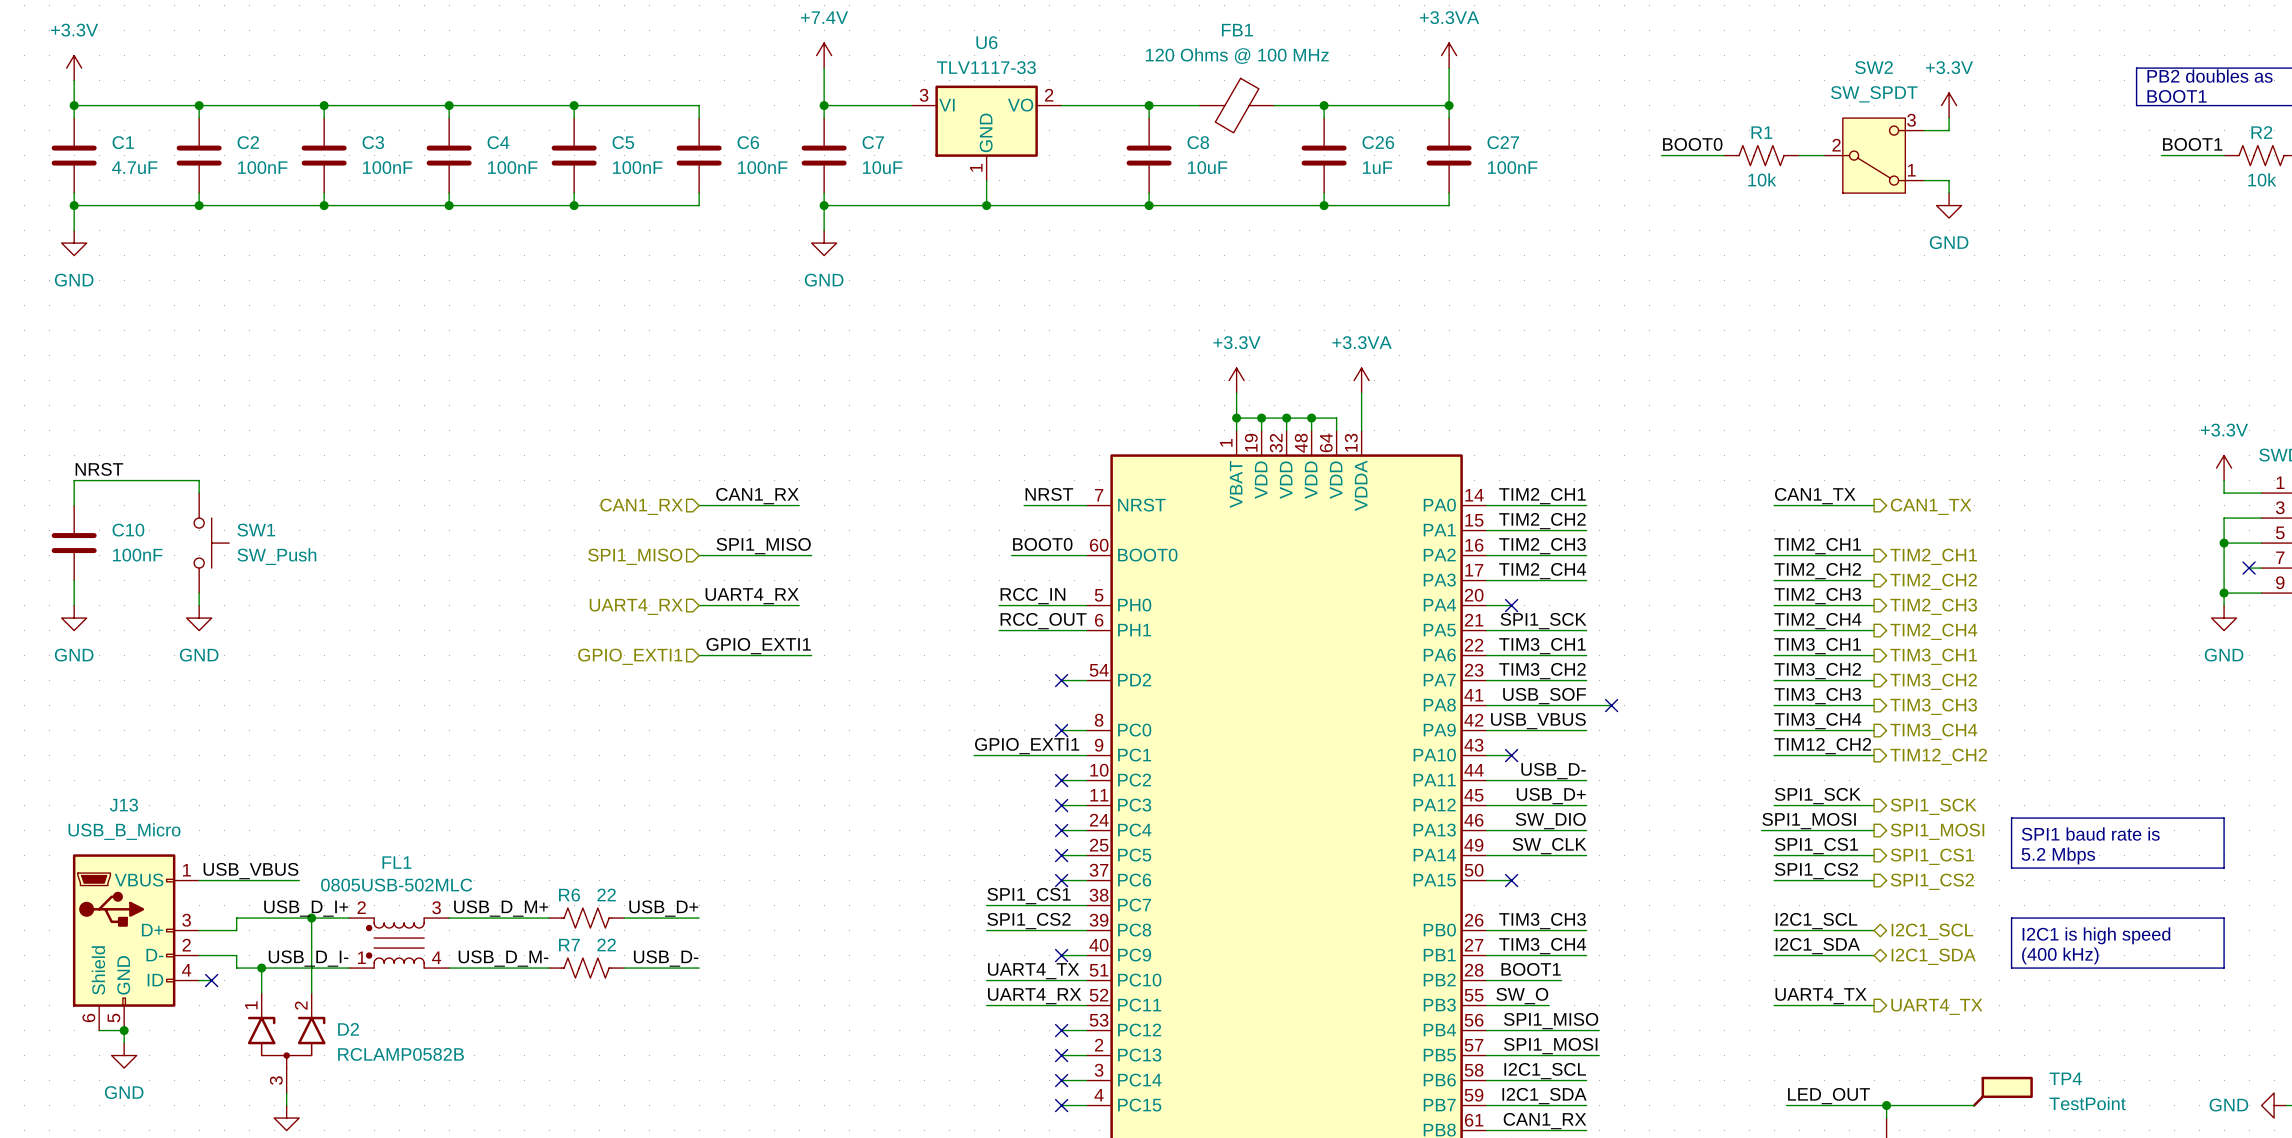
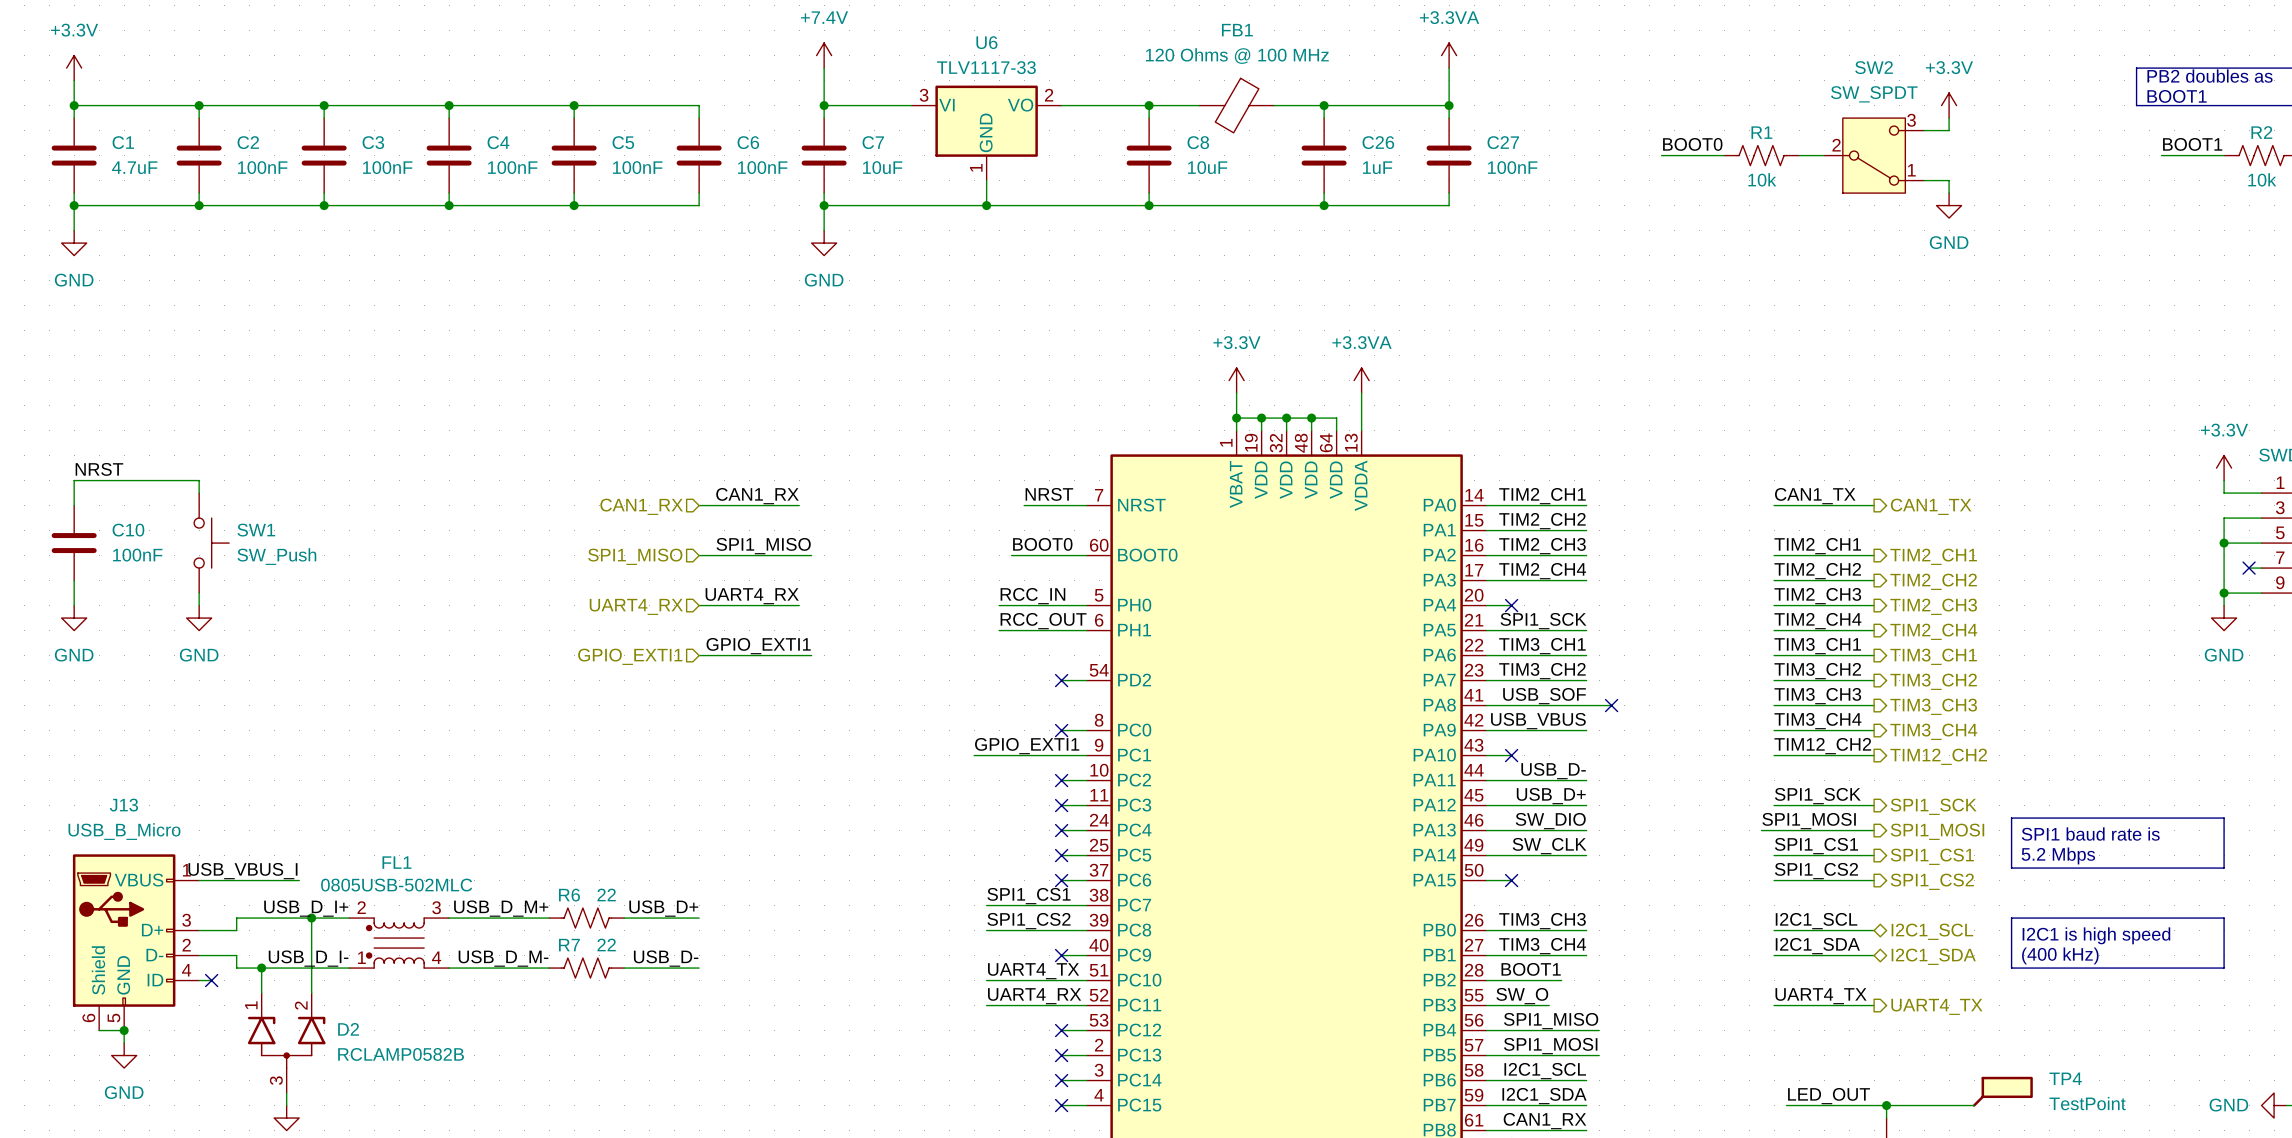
label: USB_VBUS (250, 871) -> USB_VBUS_I (242, 871)

